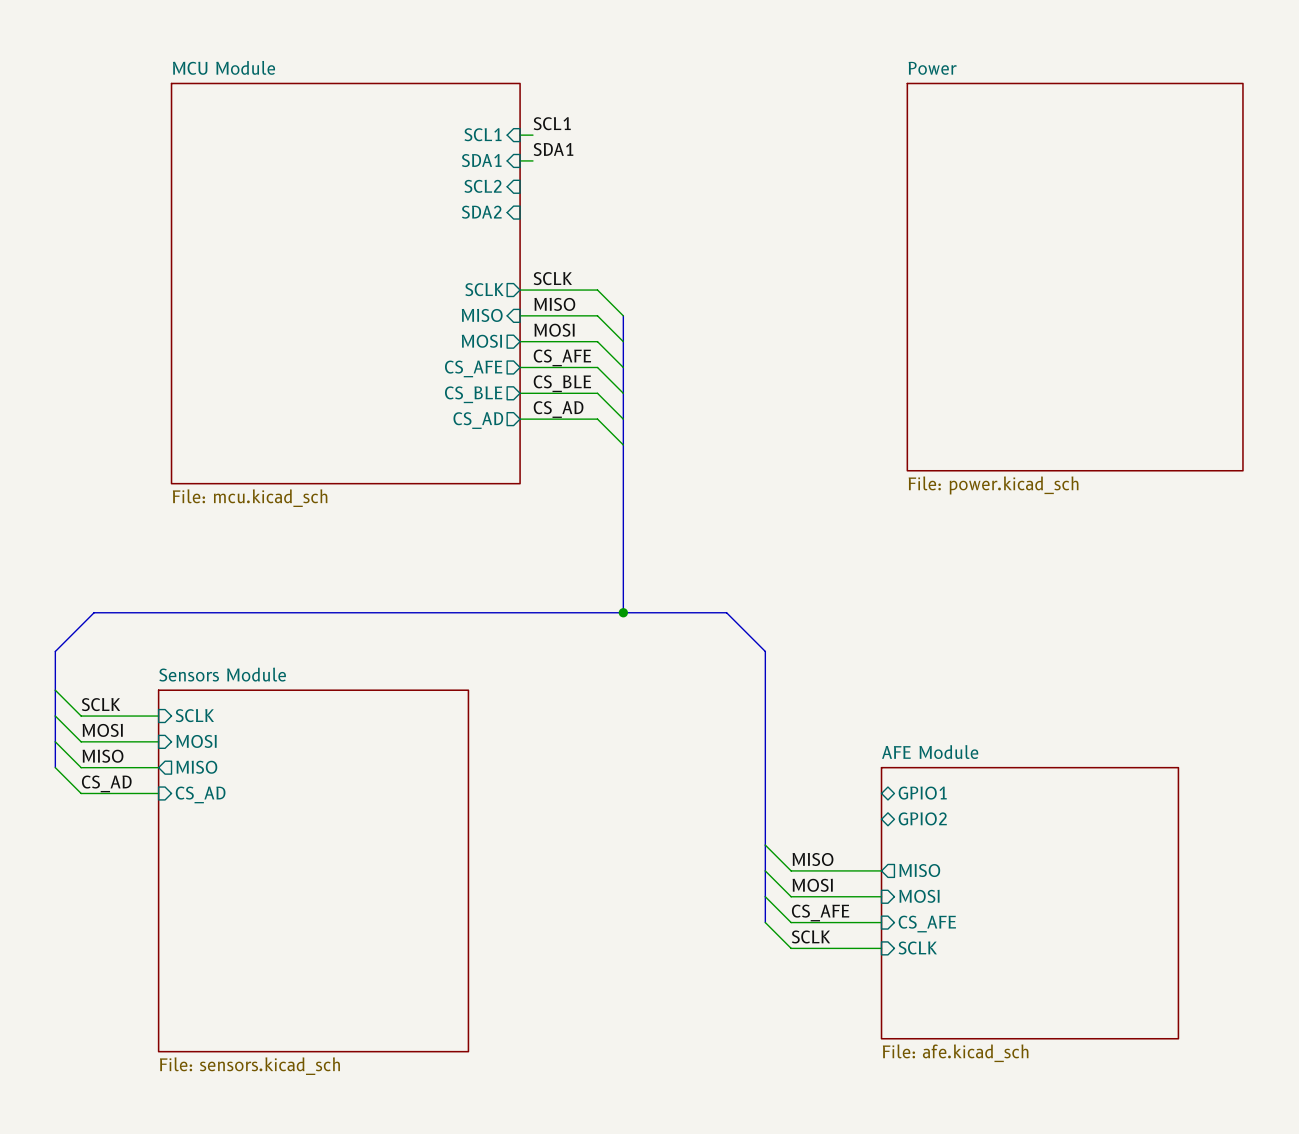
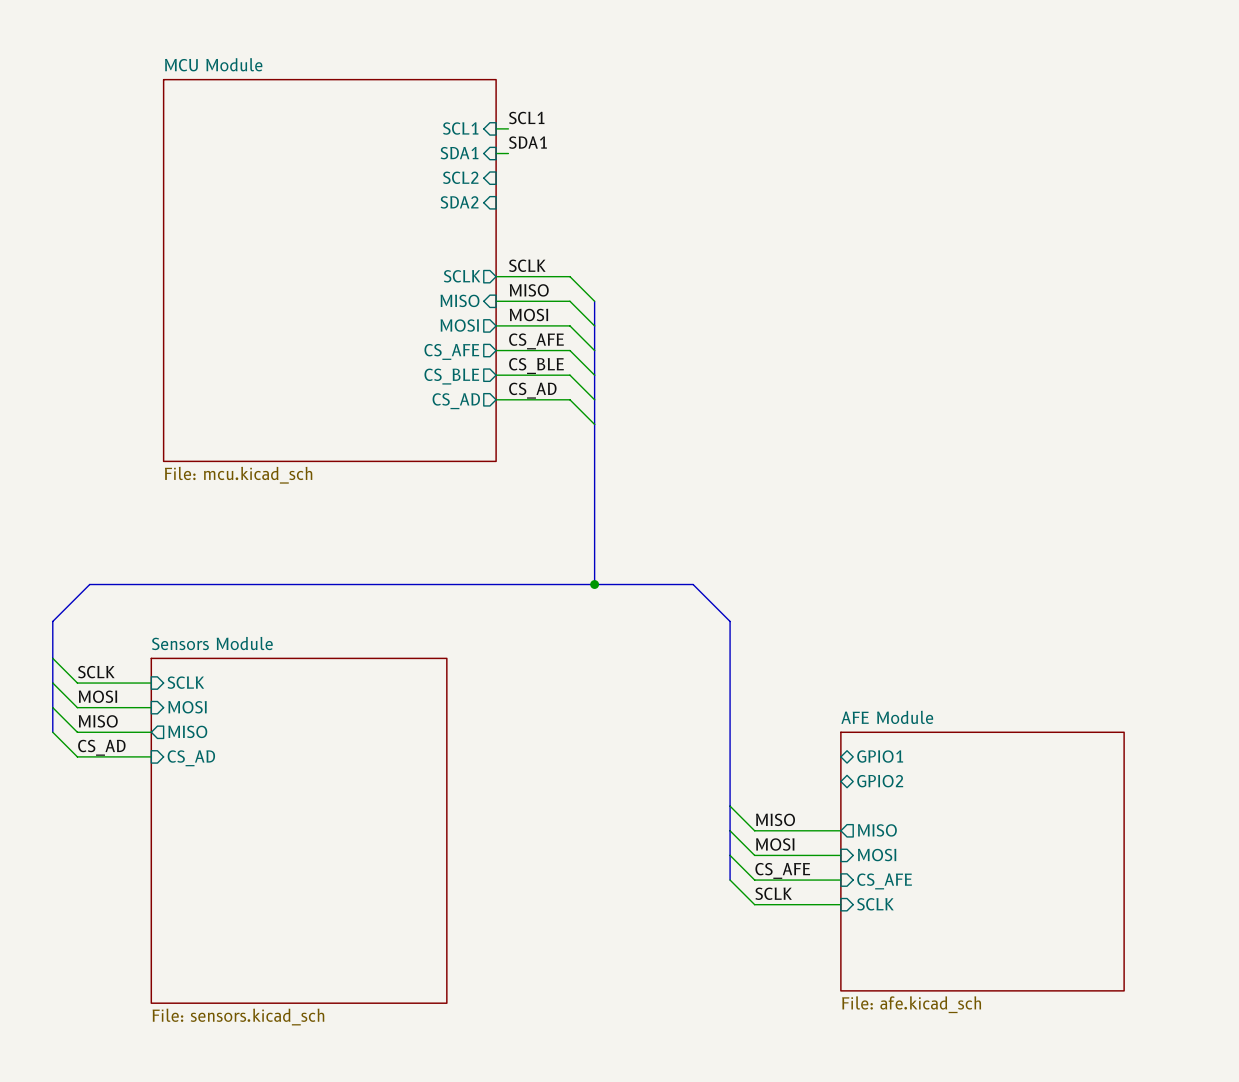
sheet Power: File: power.kicad_sch (1075, 277) -> none

